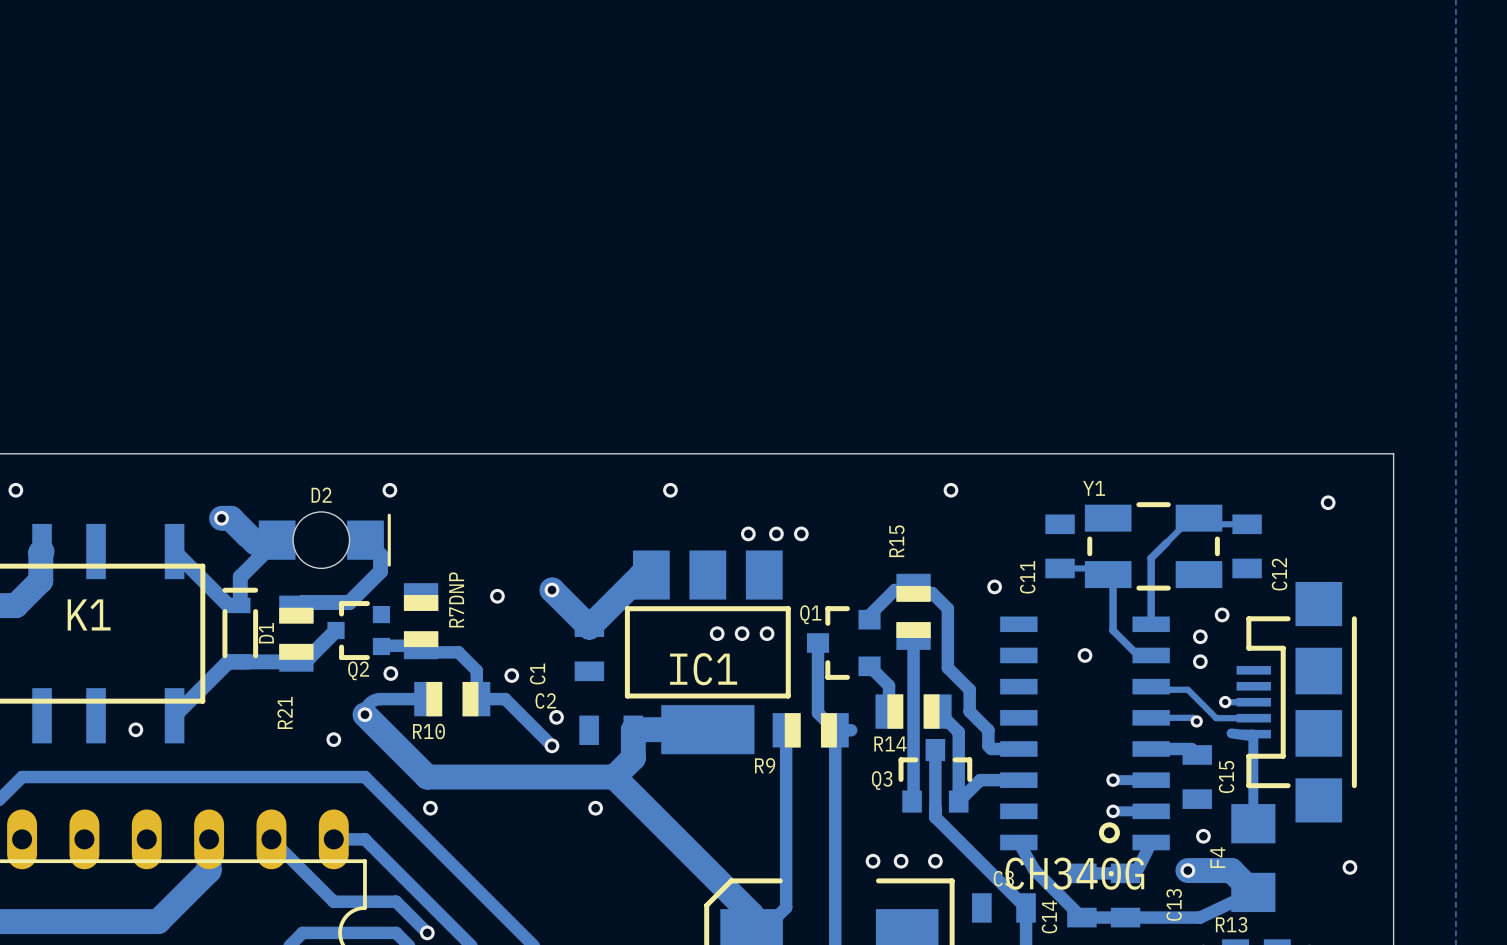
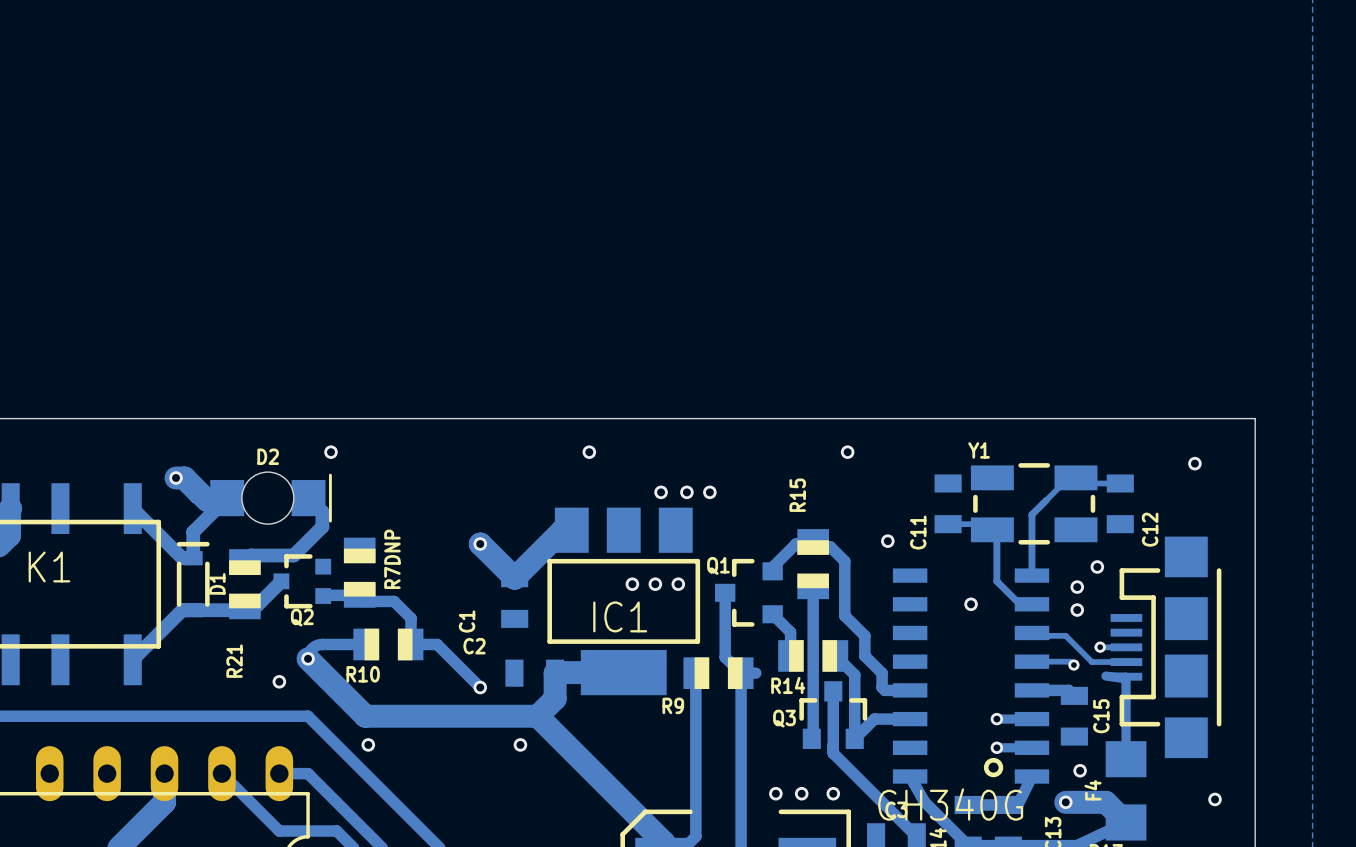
via: (497, 596) -> none
via: (390, 673) -> none
via: (511, 675) -> none
via: (556, 717) -> none
via: (135, 729) -> none

